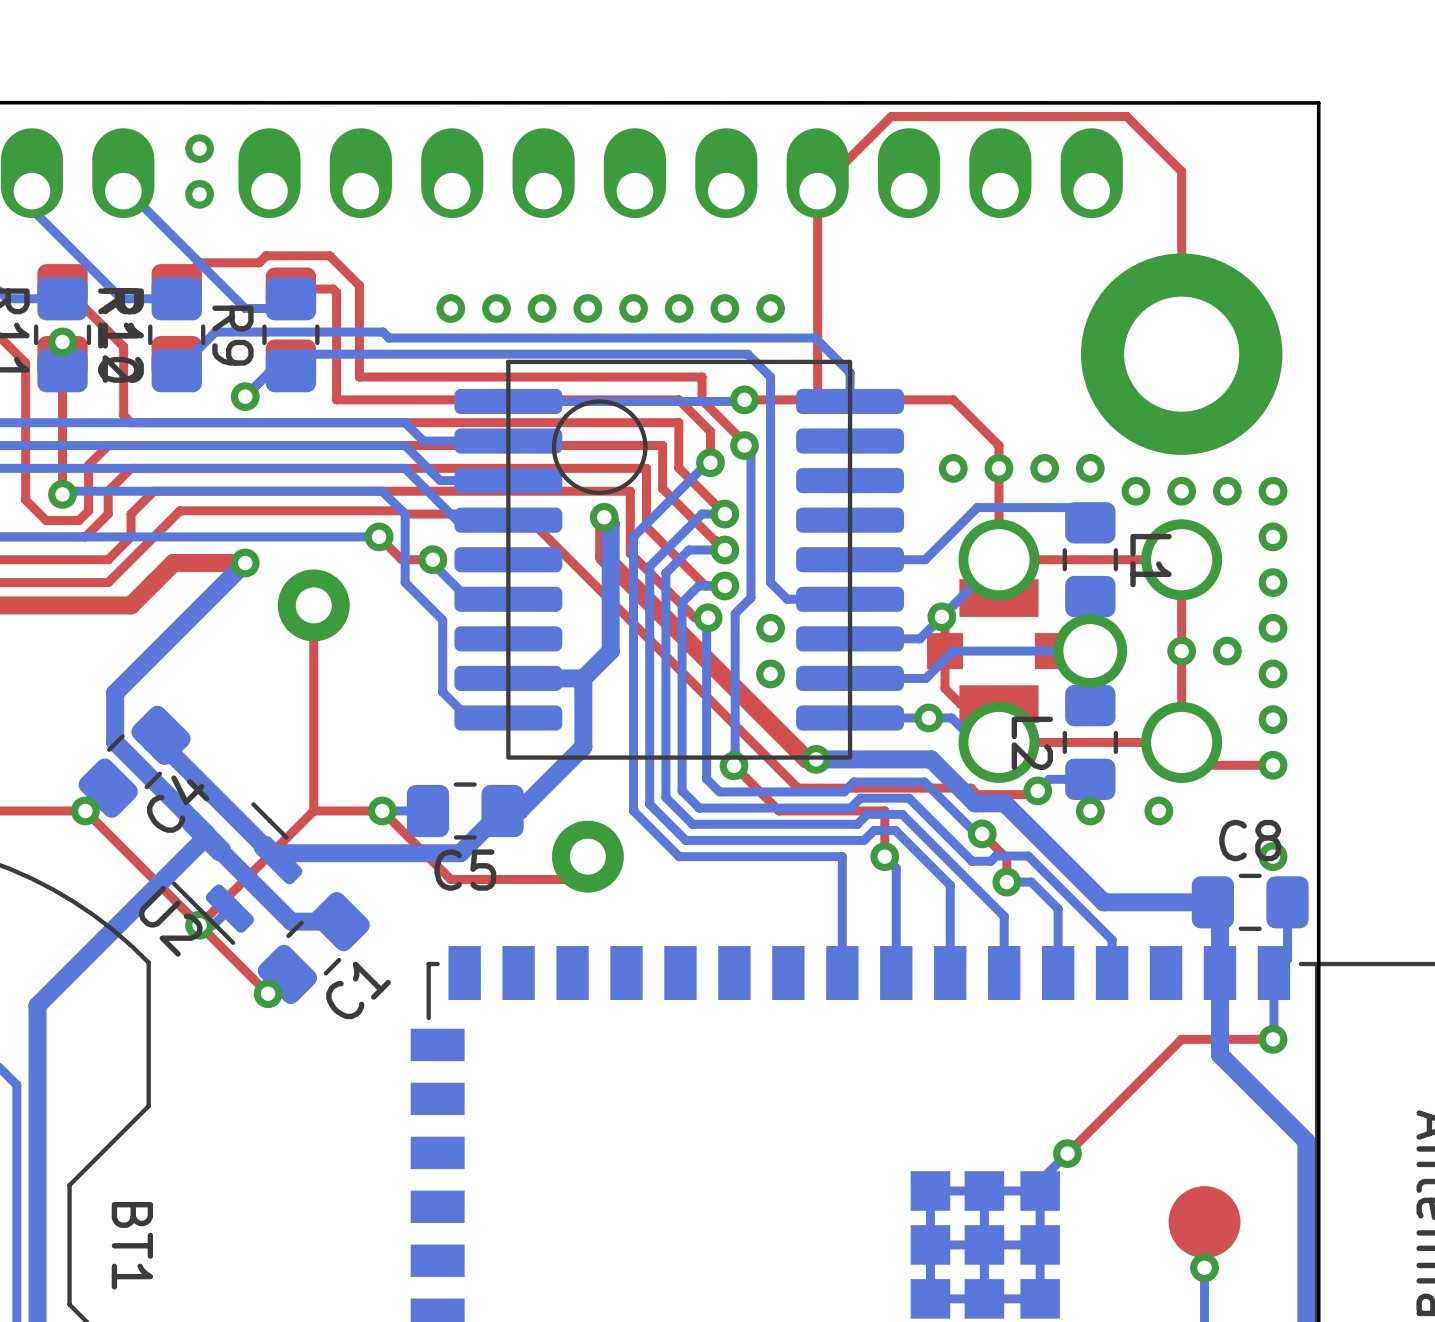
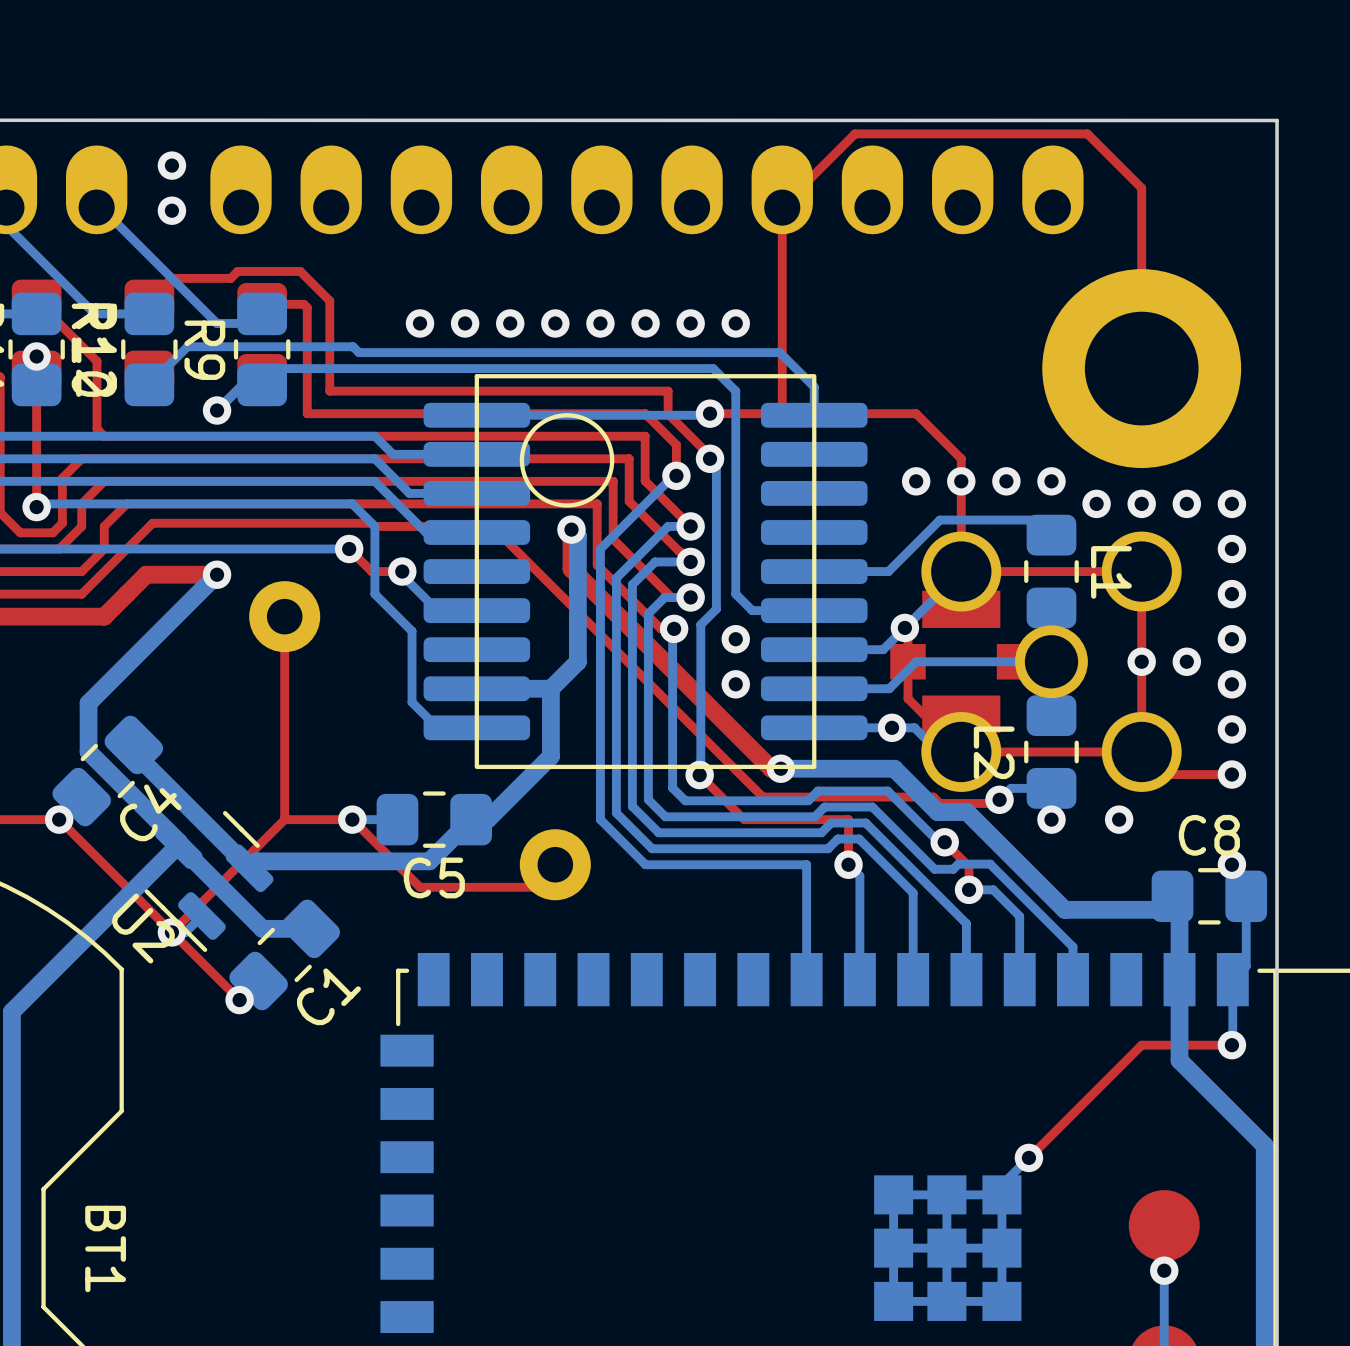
C8 position: (1250, 902) -> (1209, 896)

